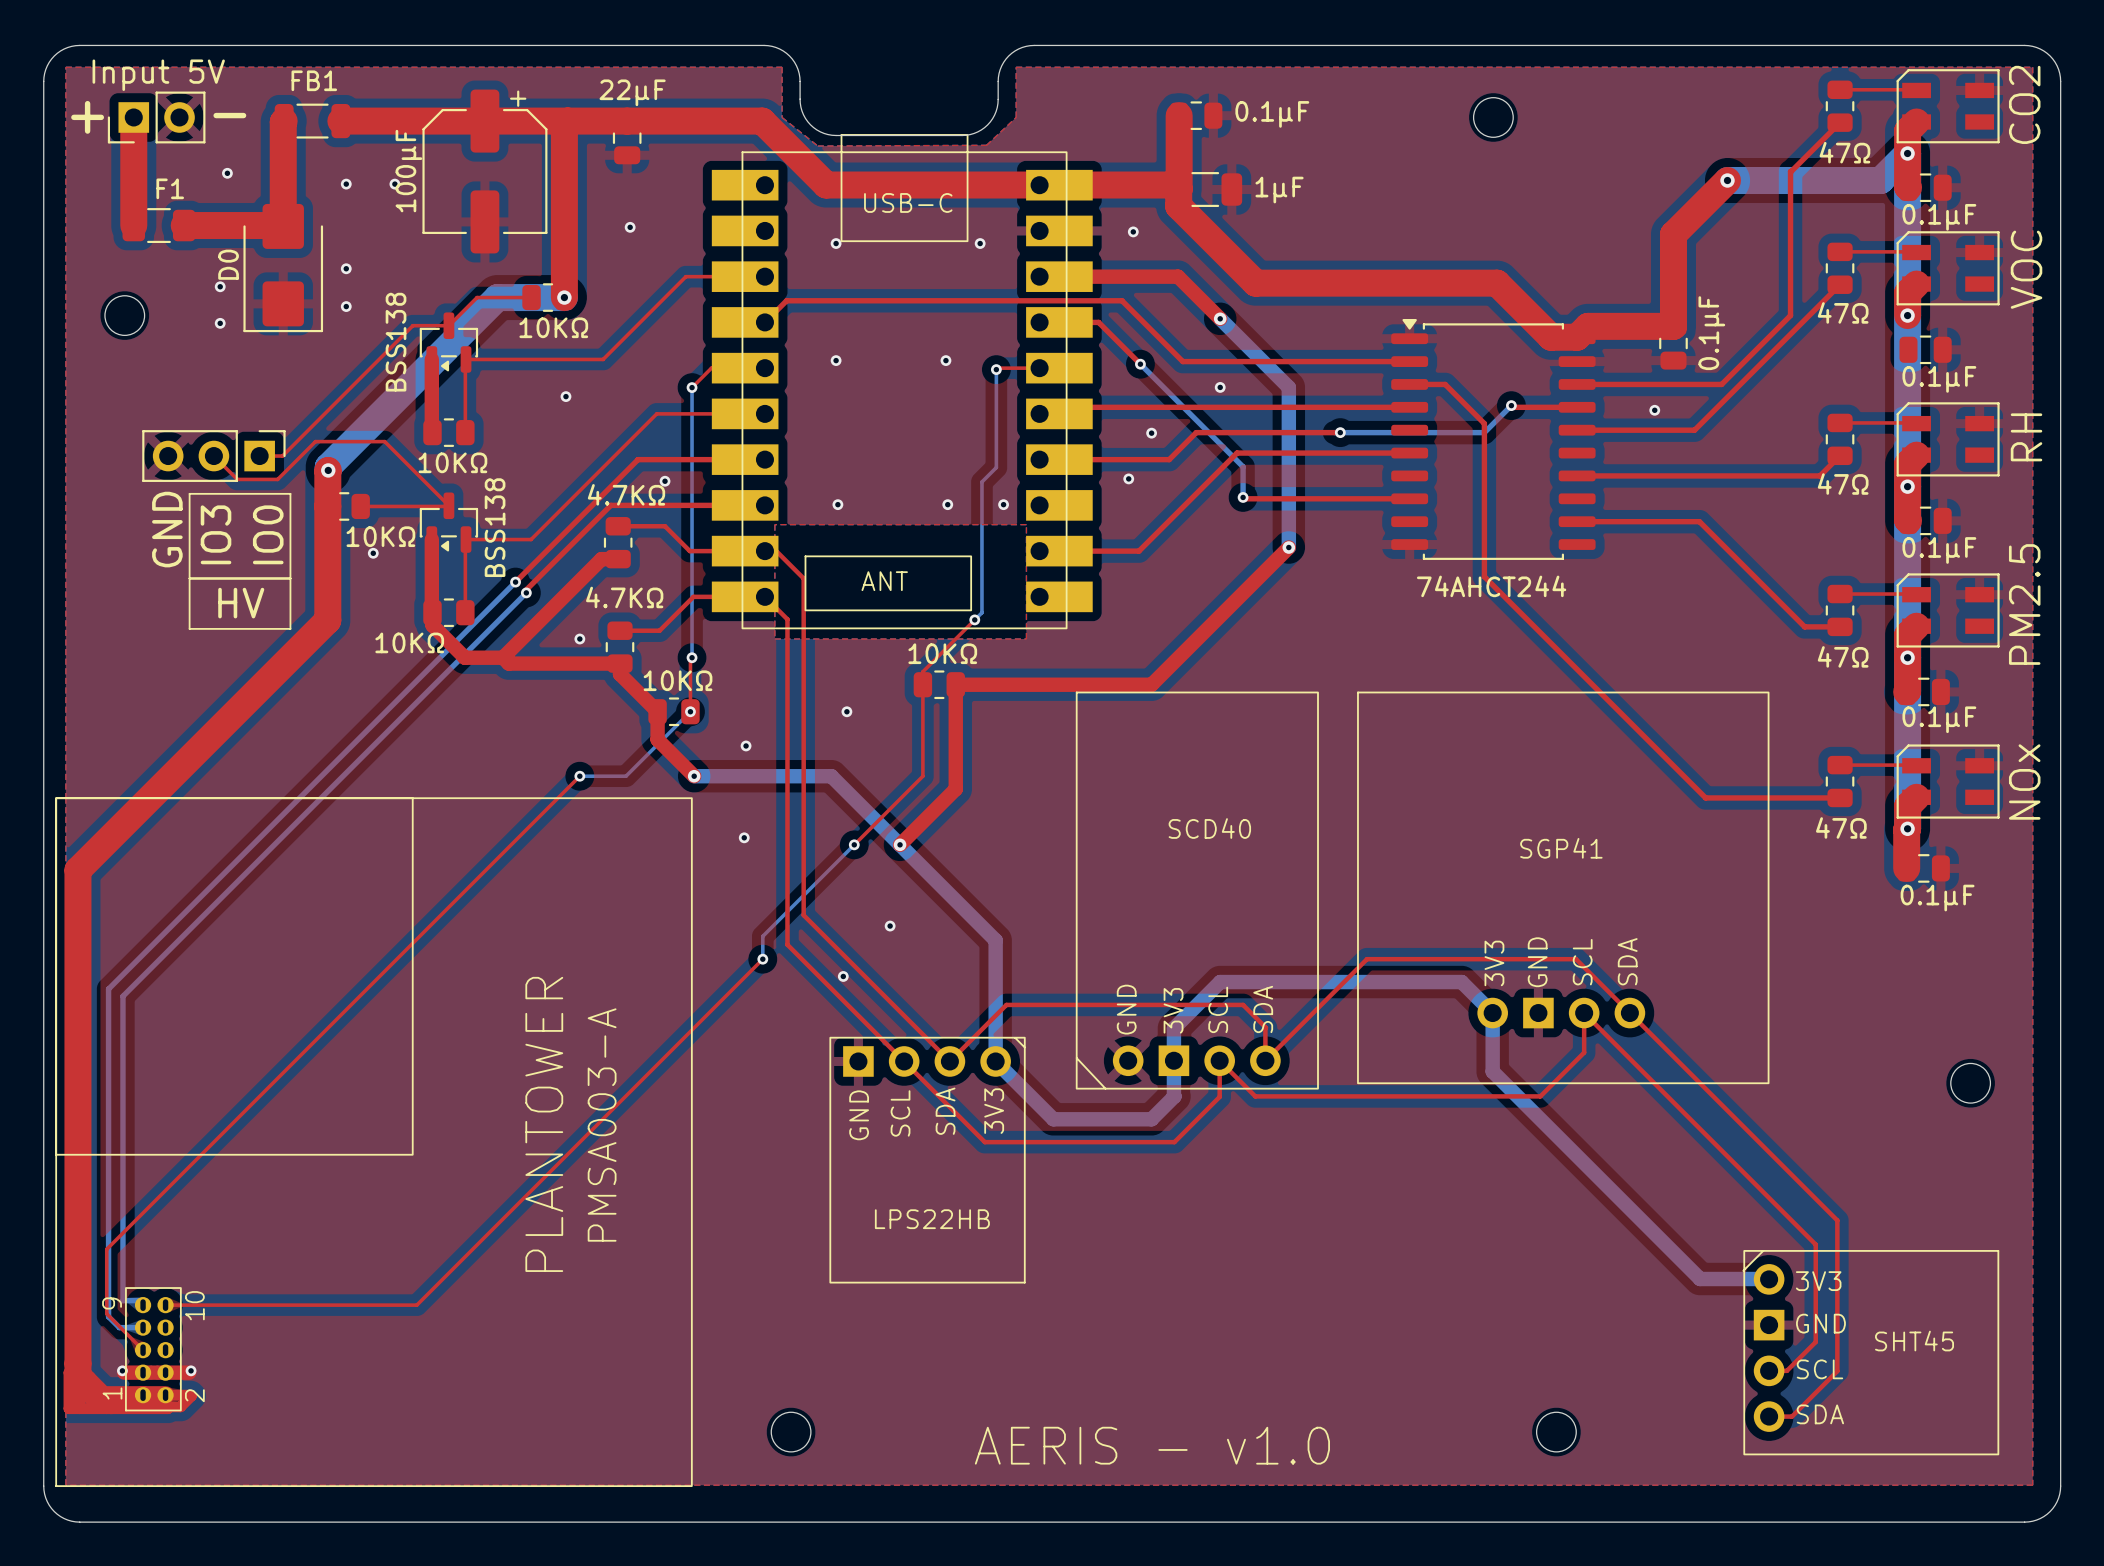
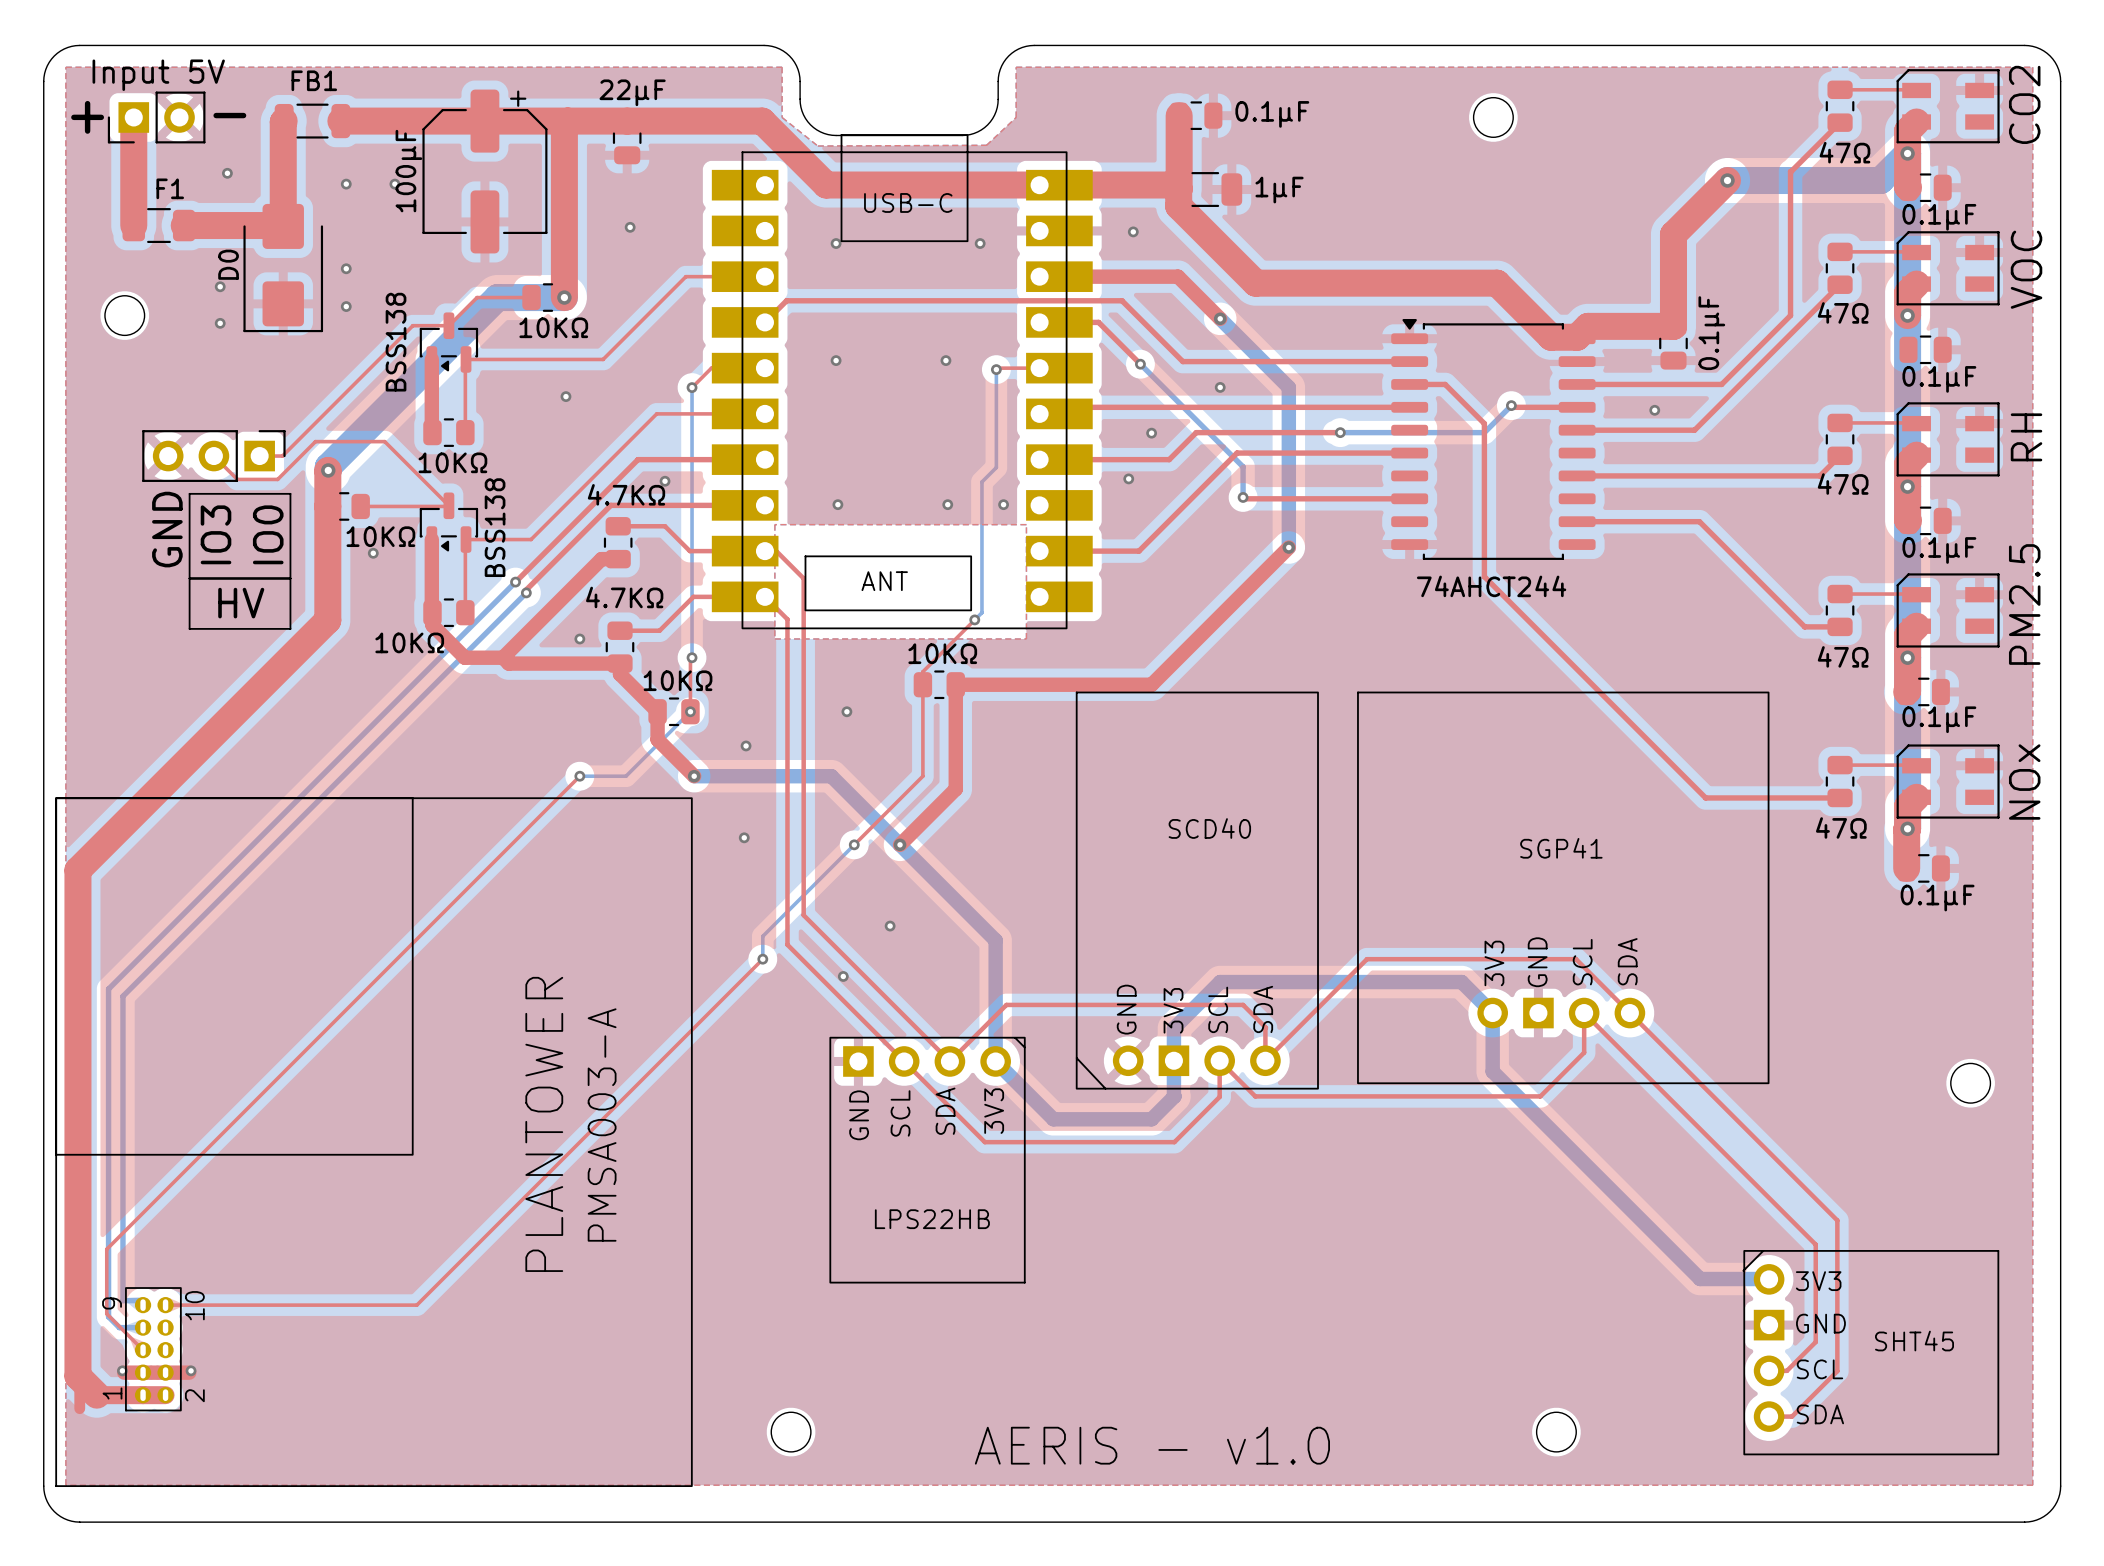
top track: (77, 1363) (68, 1372) (68, 1408) (167, 1408) (169, 1406) (180, 1406) (191, 1396) (165, 1395) -> none

